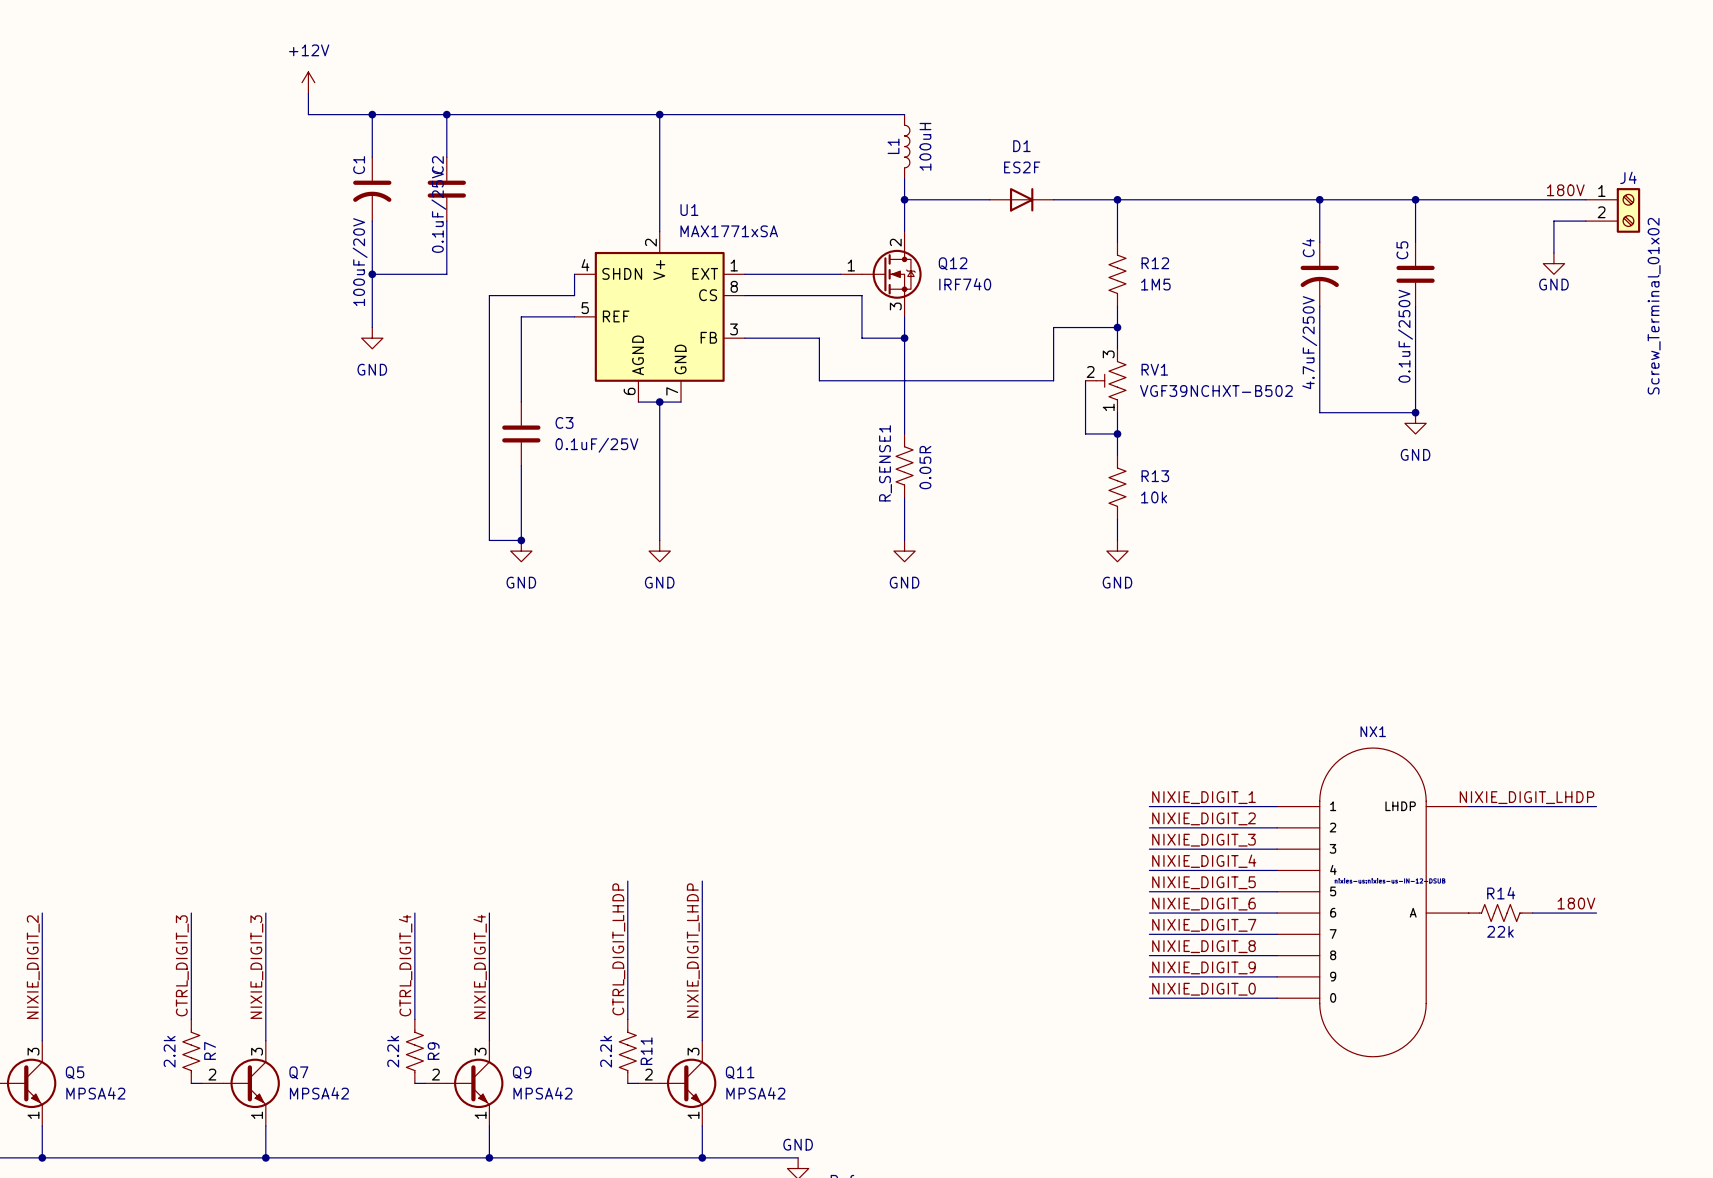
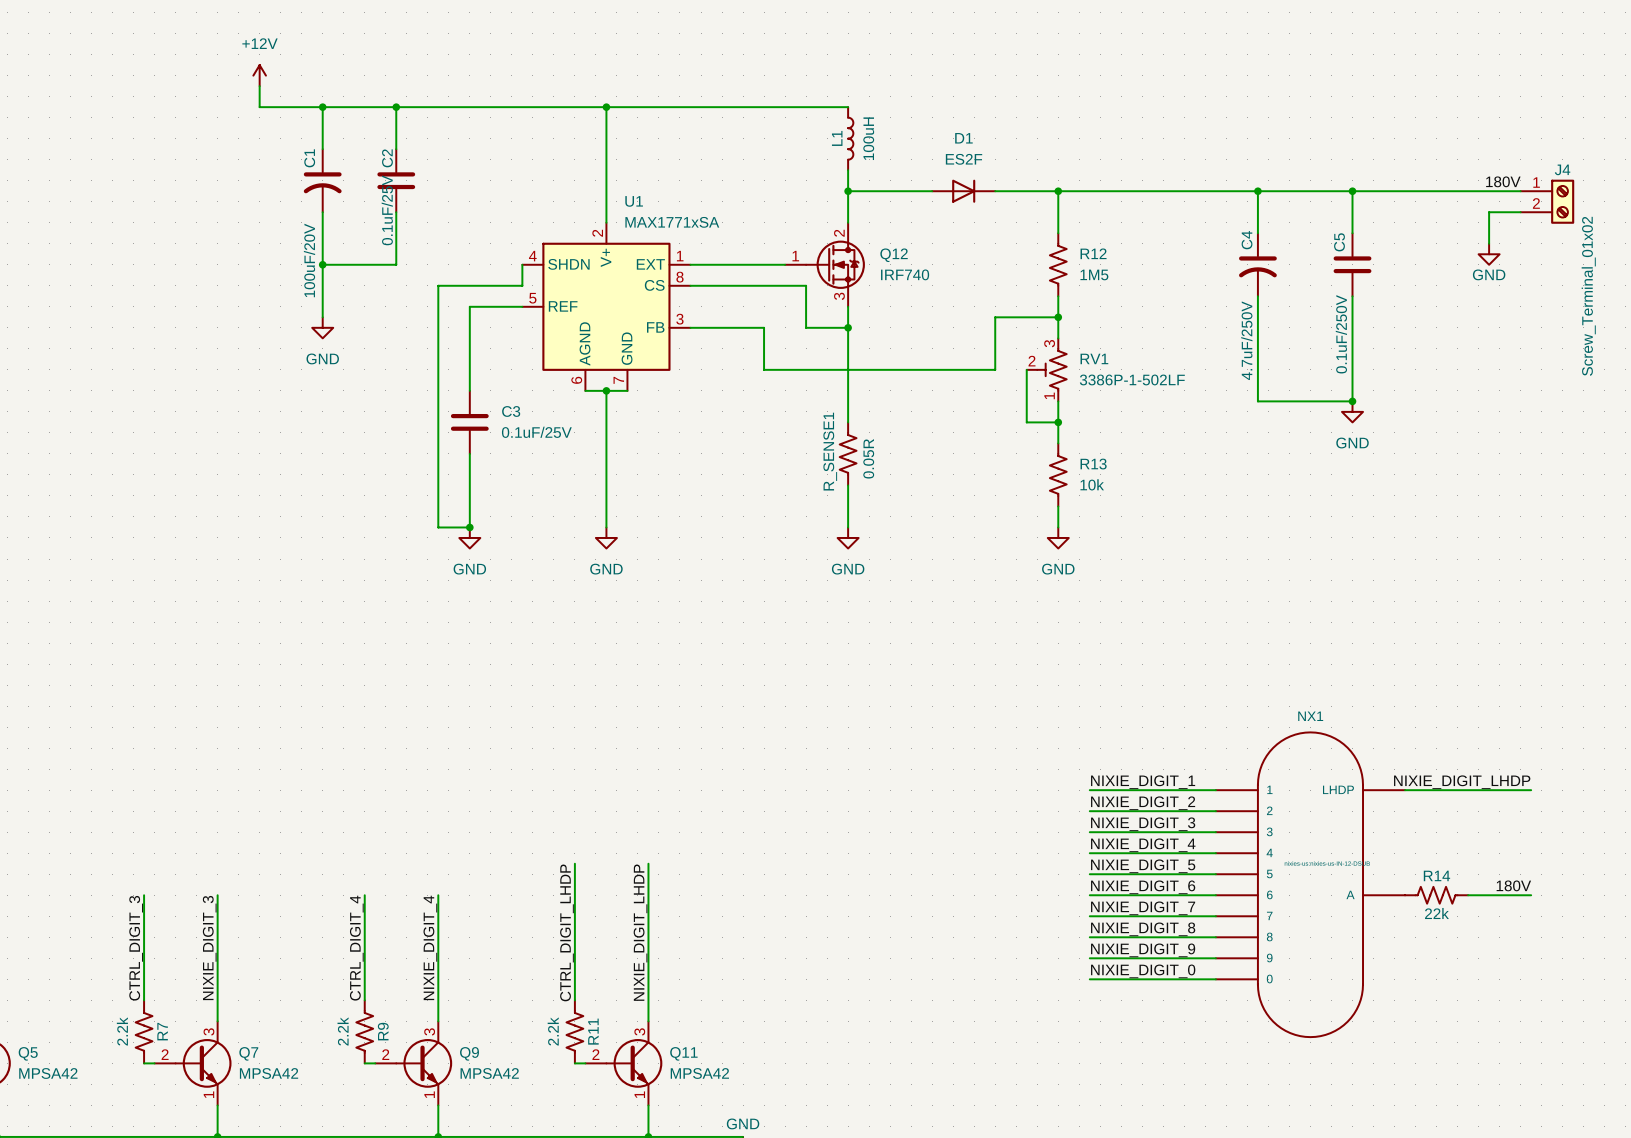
RV1 value: VGF39NCHXT-B502 (1216, 391) -> 3386P-1-502LF (1132, 379)

